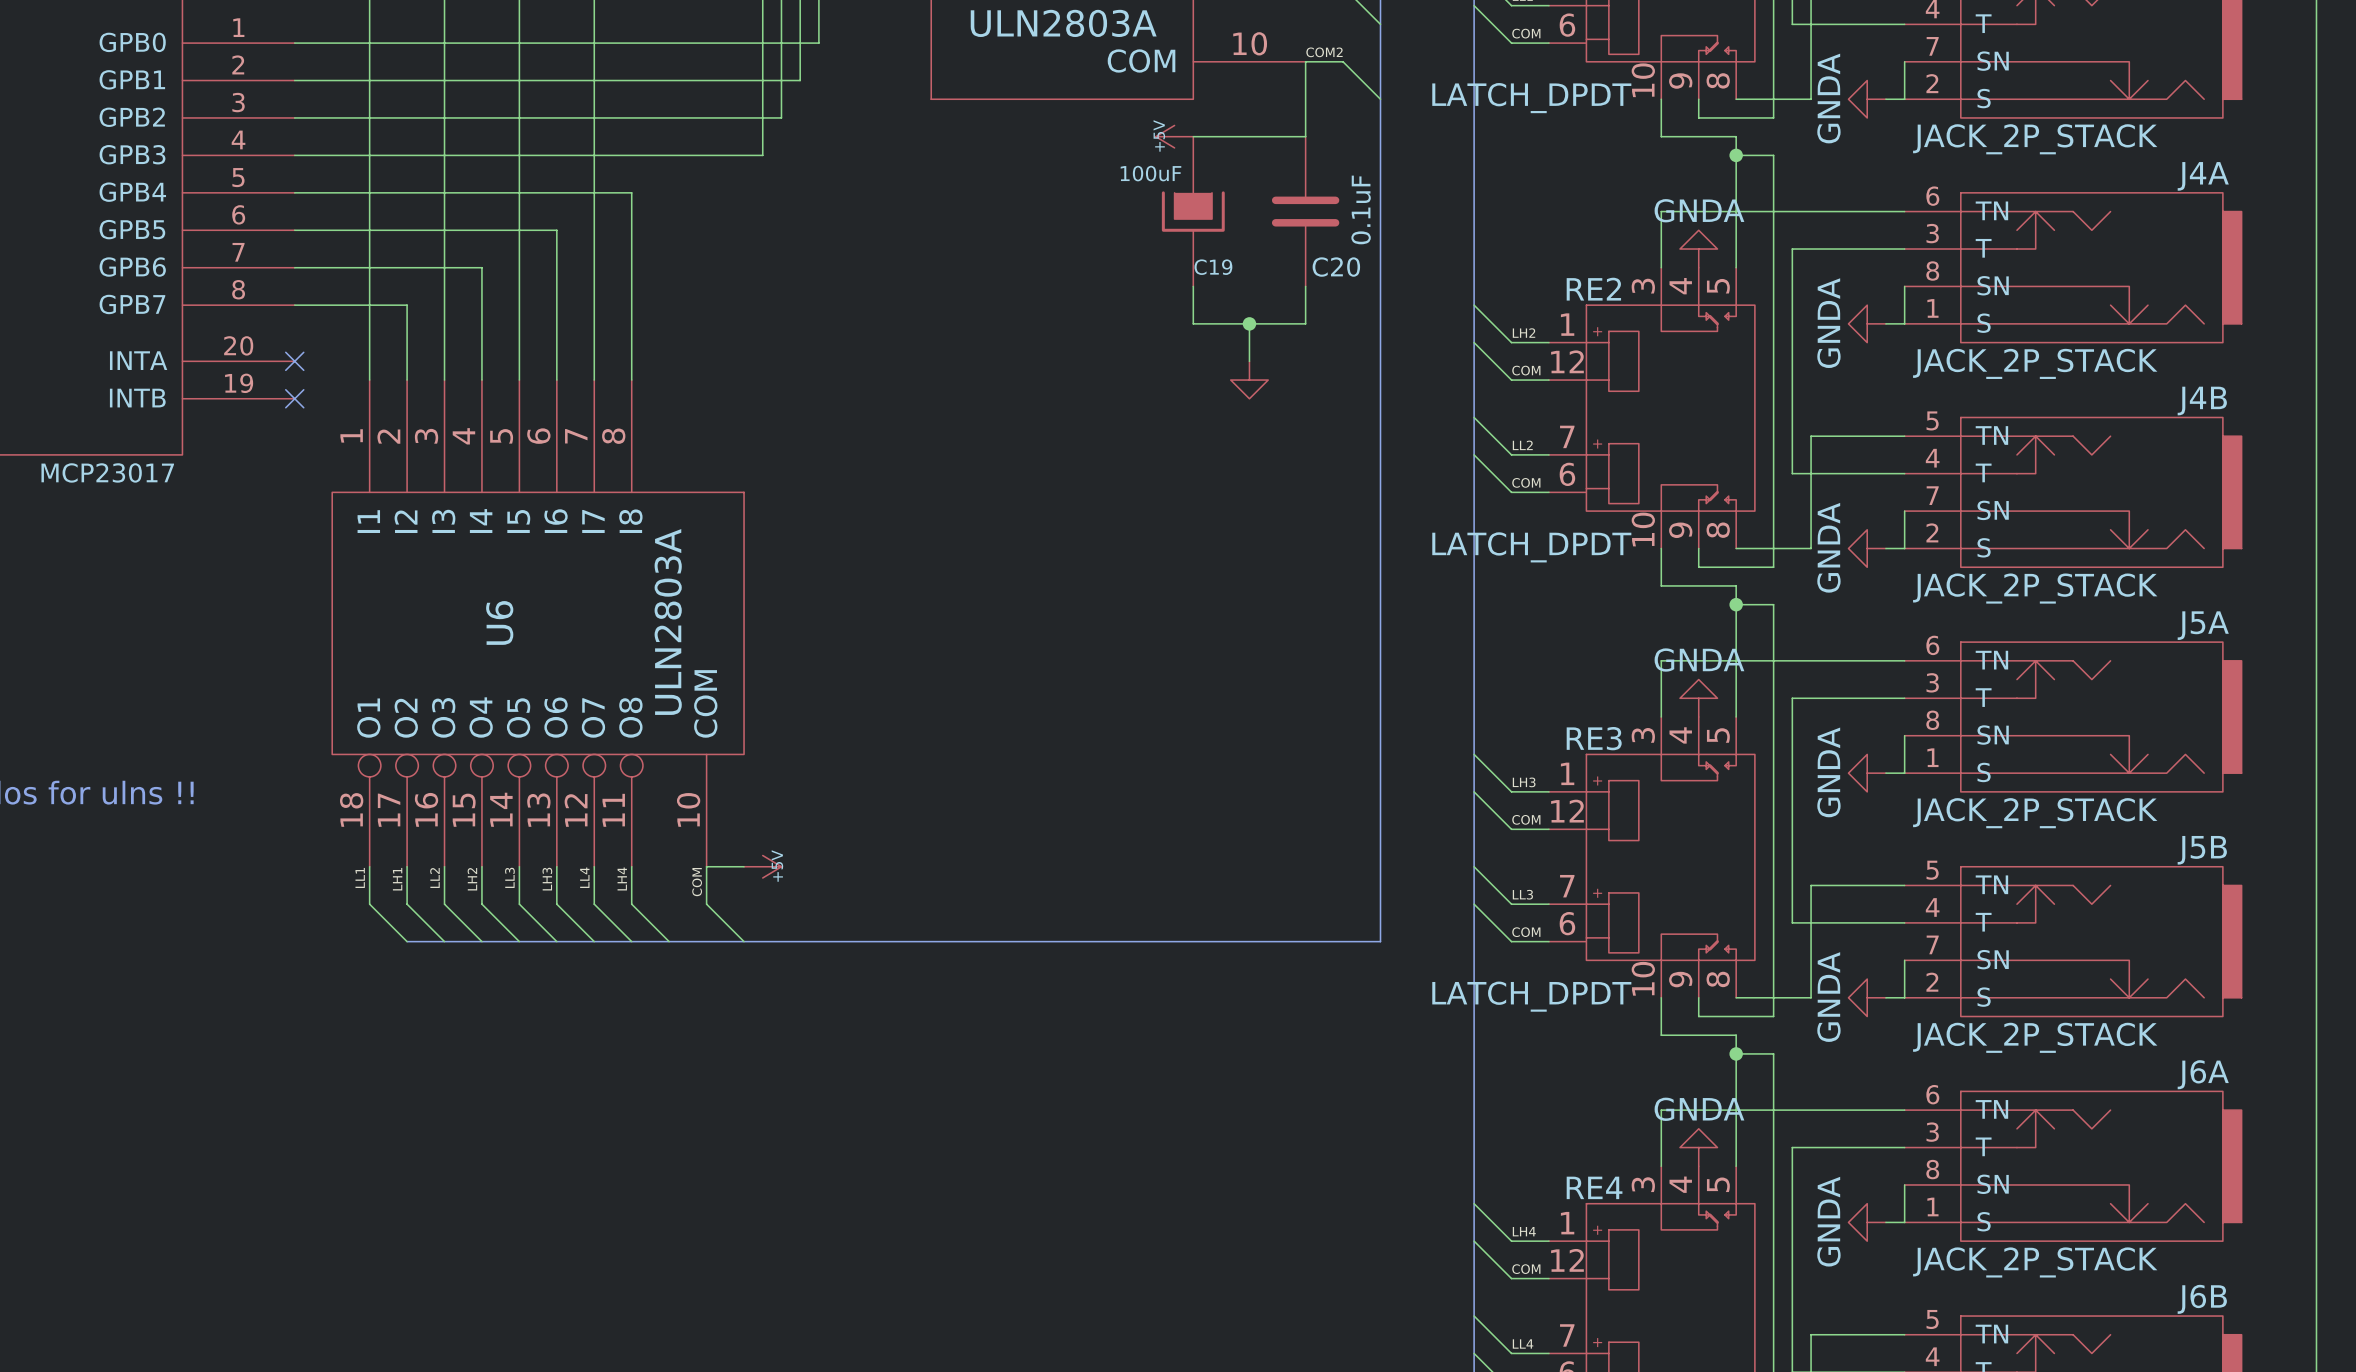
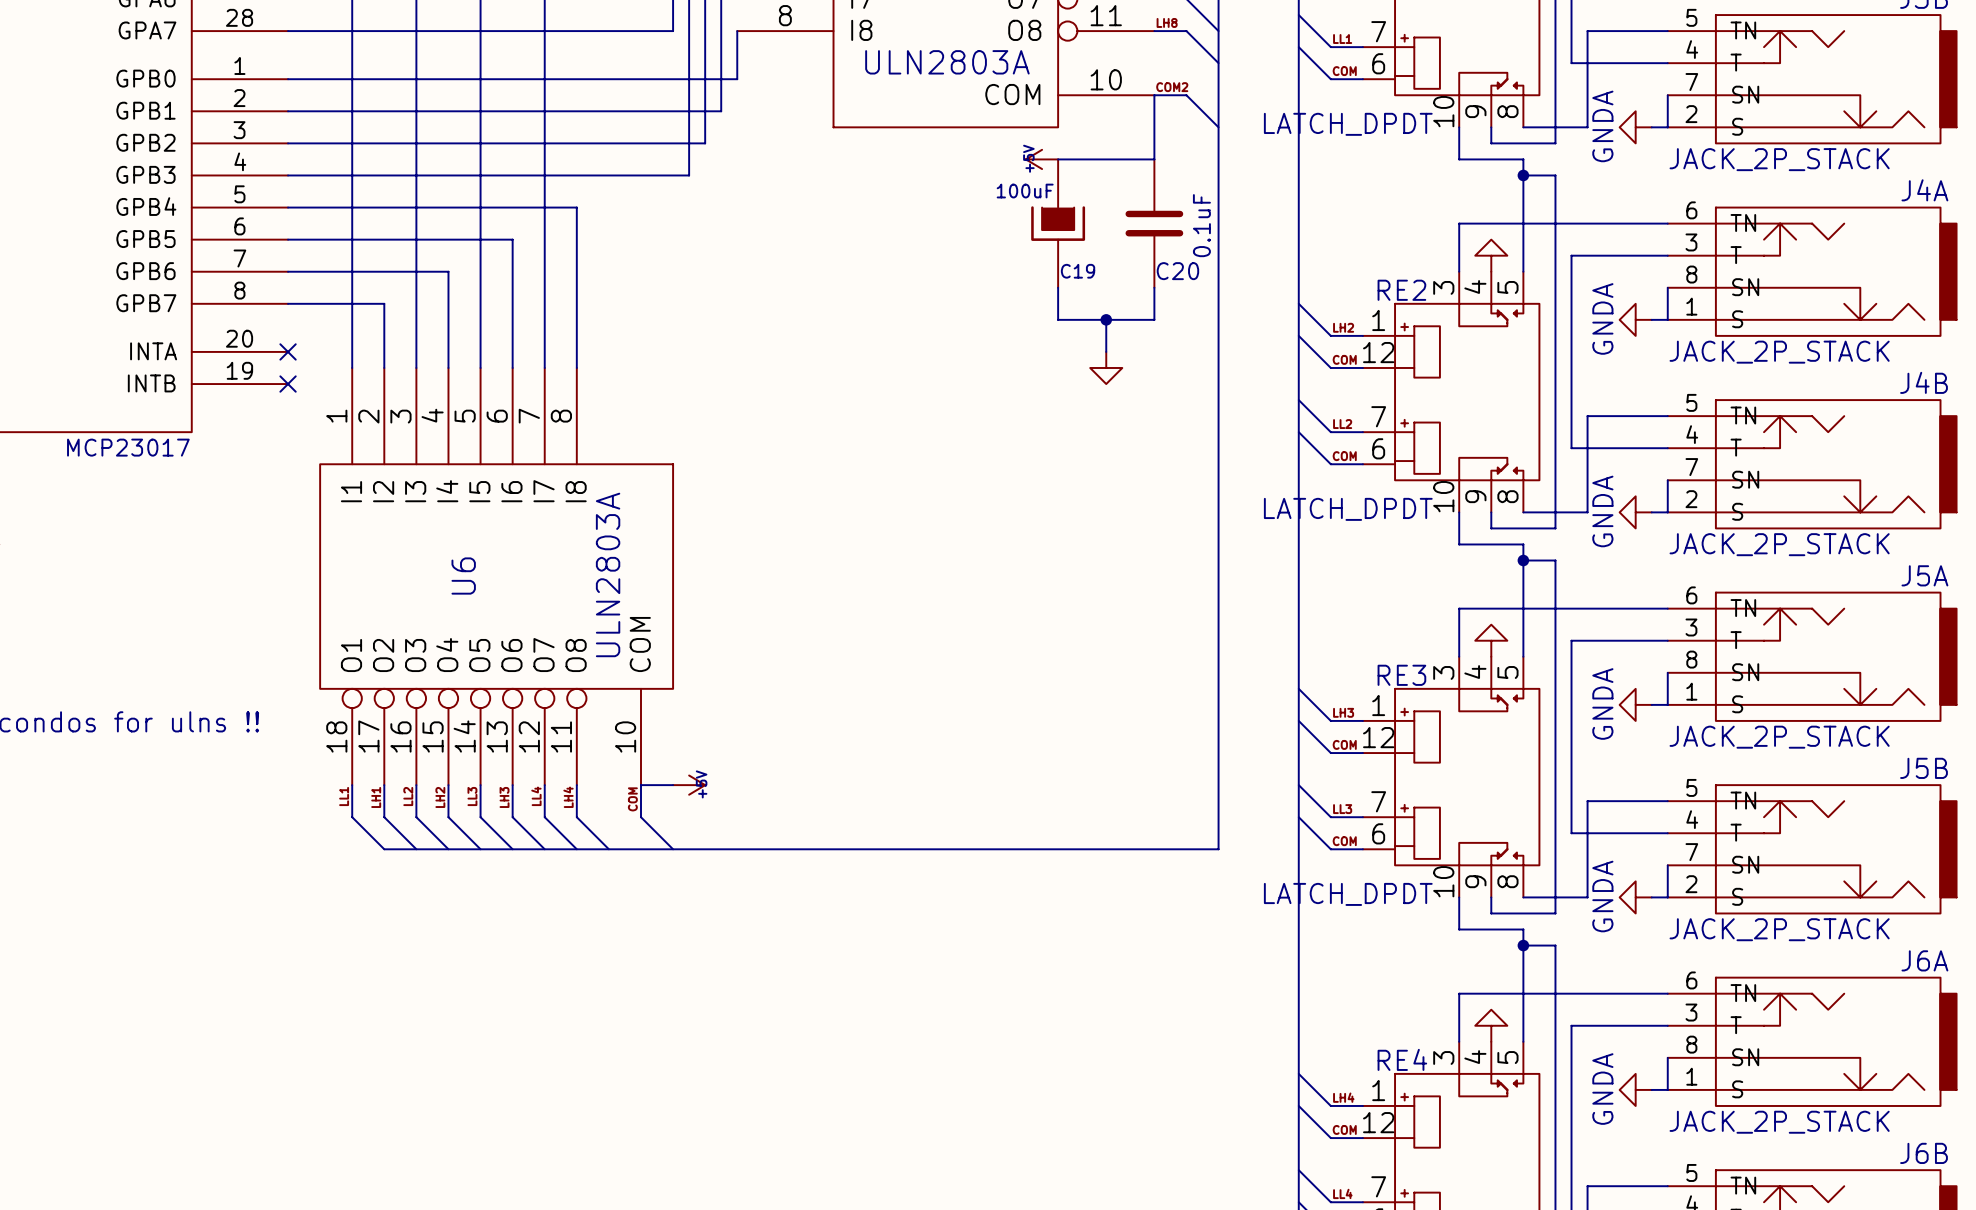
power symbol text: GNDA (1699, 210) -> none
power symbol text: GNDA (1699, 660) -> none
power symbol text: GNDA (1699, 1109) -> none

